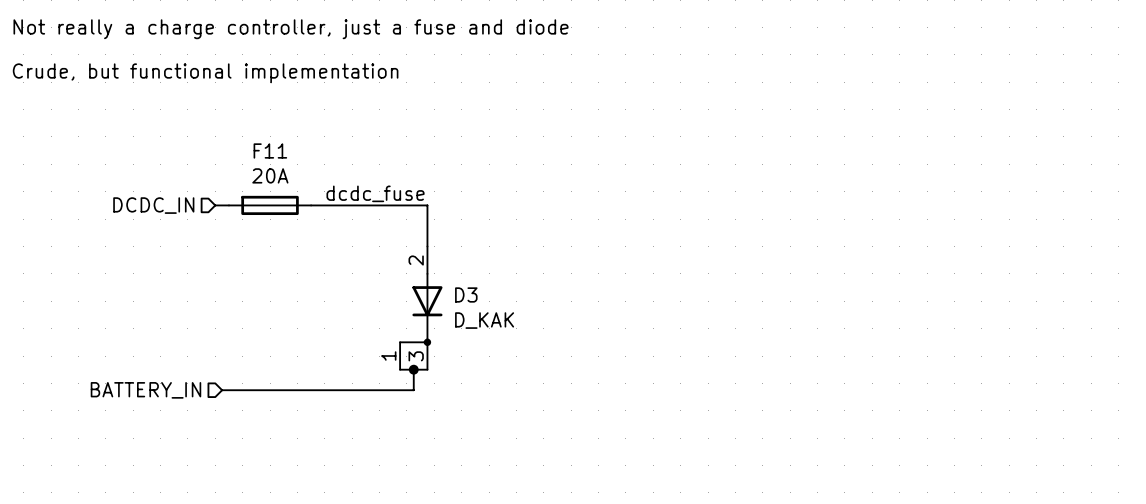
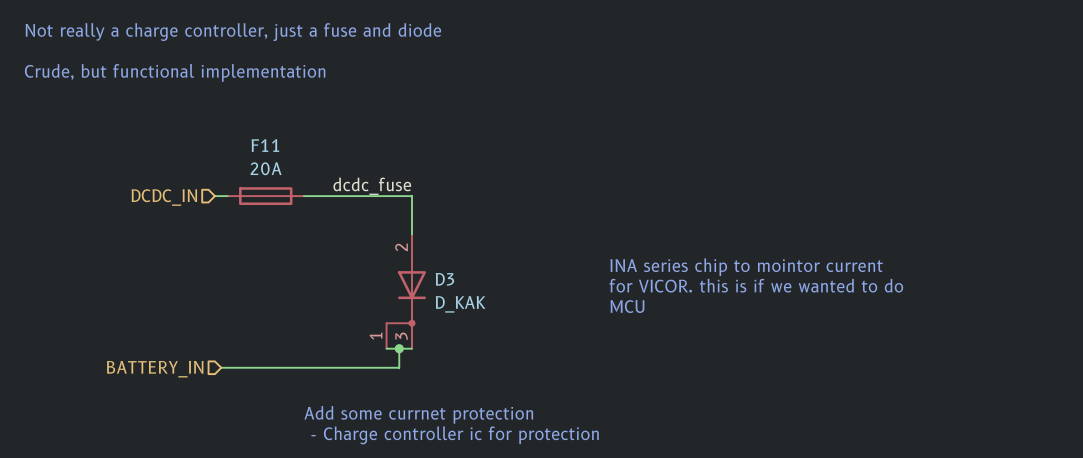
text: none -> INA series chip to mointor current (746, 267)
text: none -> for VICOR. this is if we wanted to do (756, 285)
text: none -> MCU (627, 306)
text: none -> Add some currnet protection (418, 414)
text: none -> - Charge controller ic for protection (455, 435)

